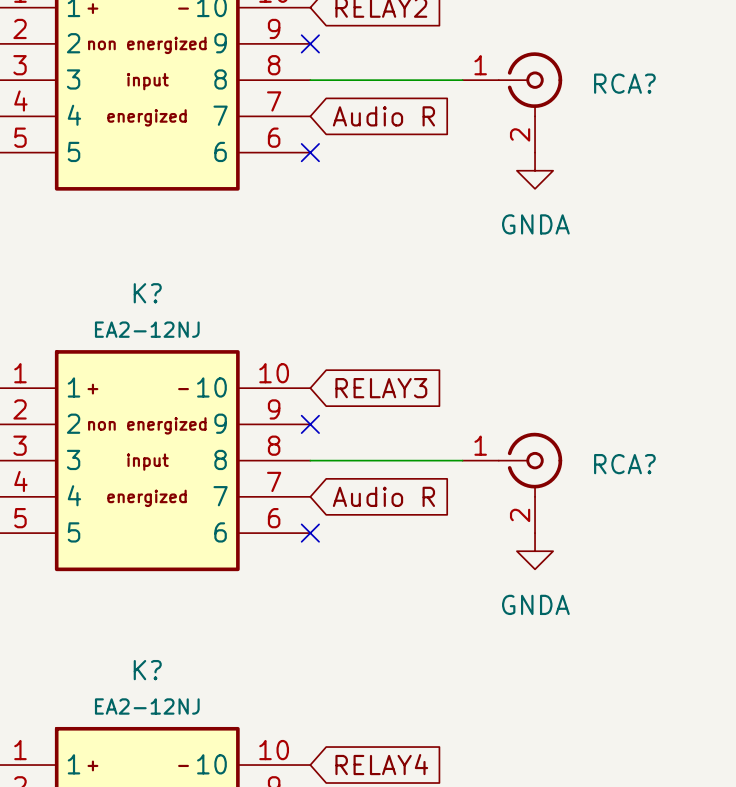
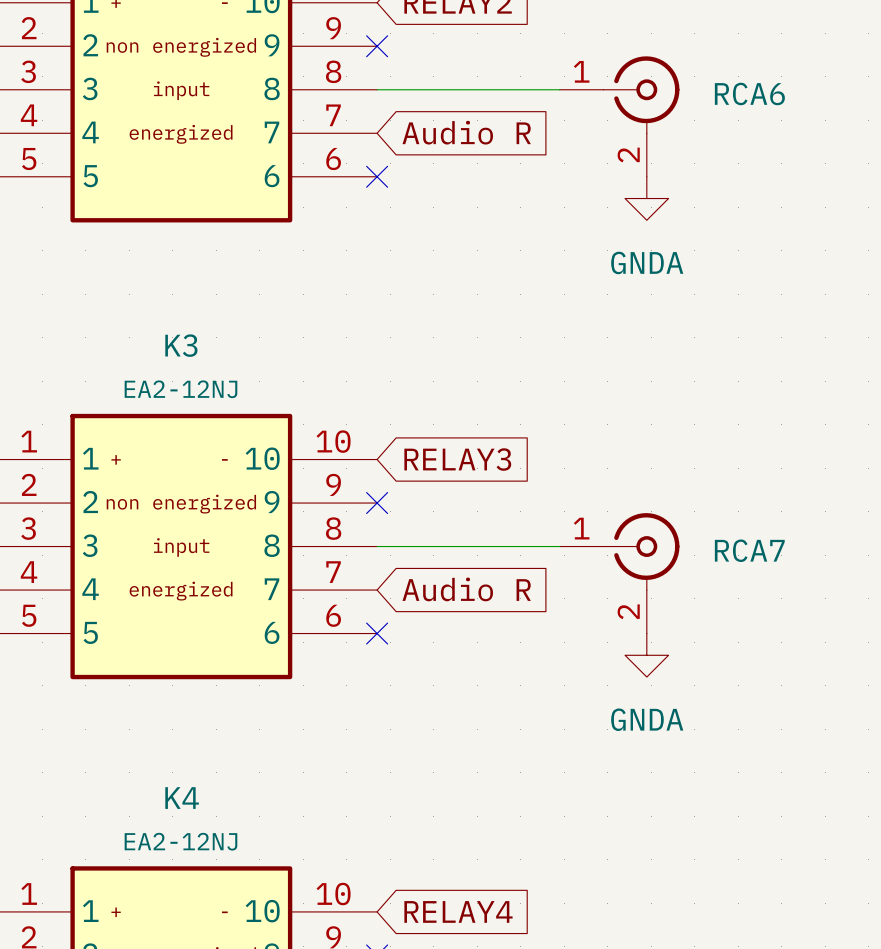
RCA? name: RCA? (624, 83) -> RCA6 (749, 93)
K? name: K? (147, 293) -> K3 (181, 345)
RCA? name: RCA? (624, 464) -> RCA7 (749, 550)
K? name: K? (147, 670) -> K4 (182, 798)

